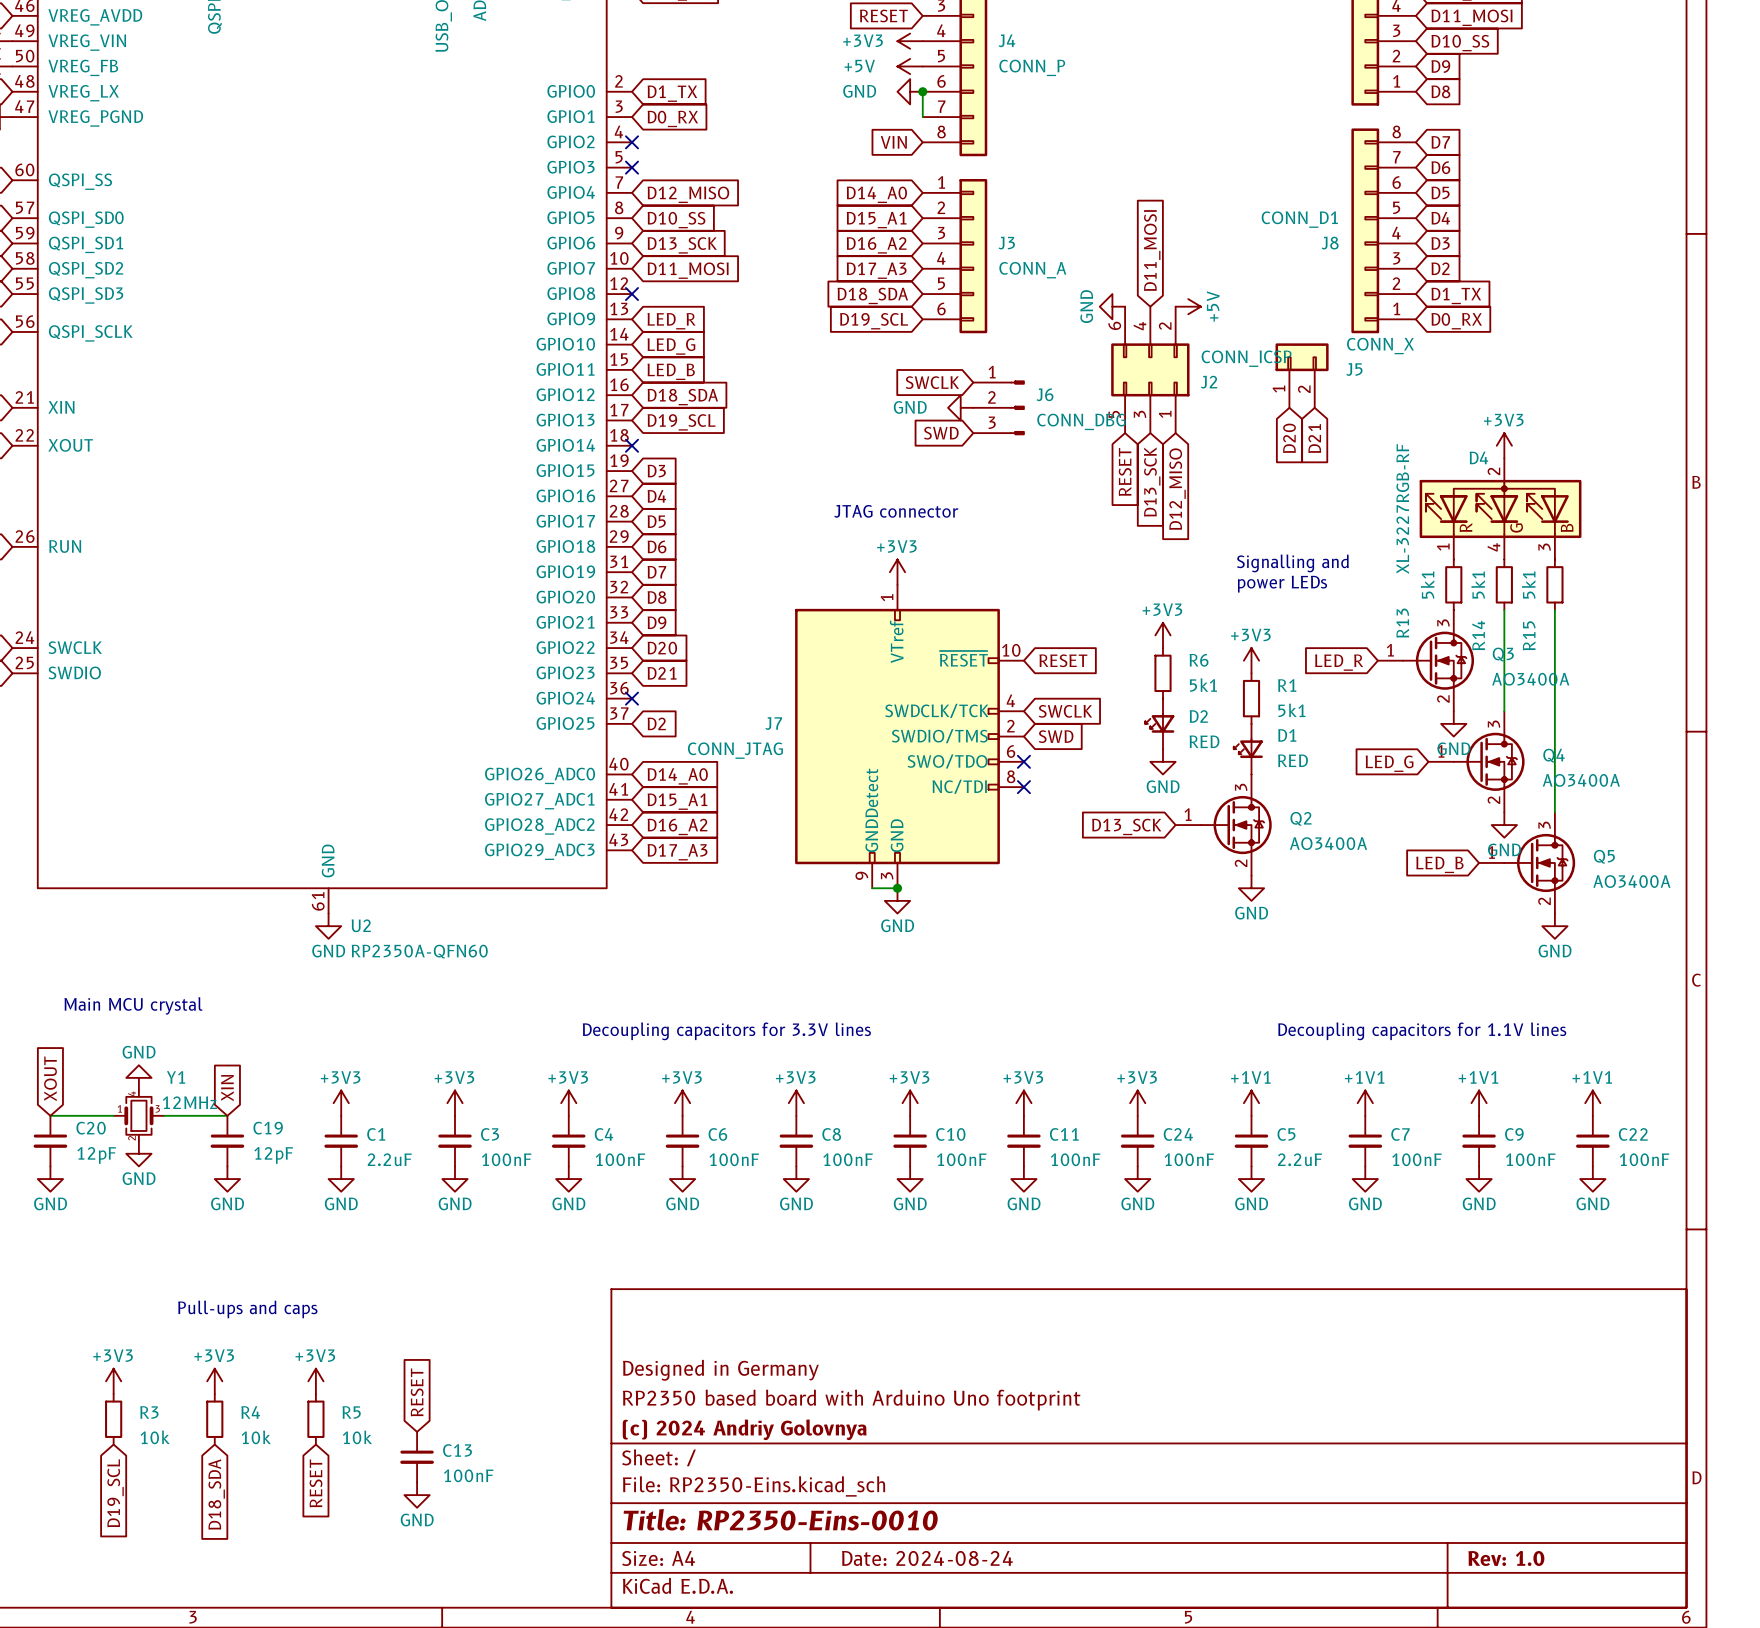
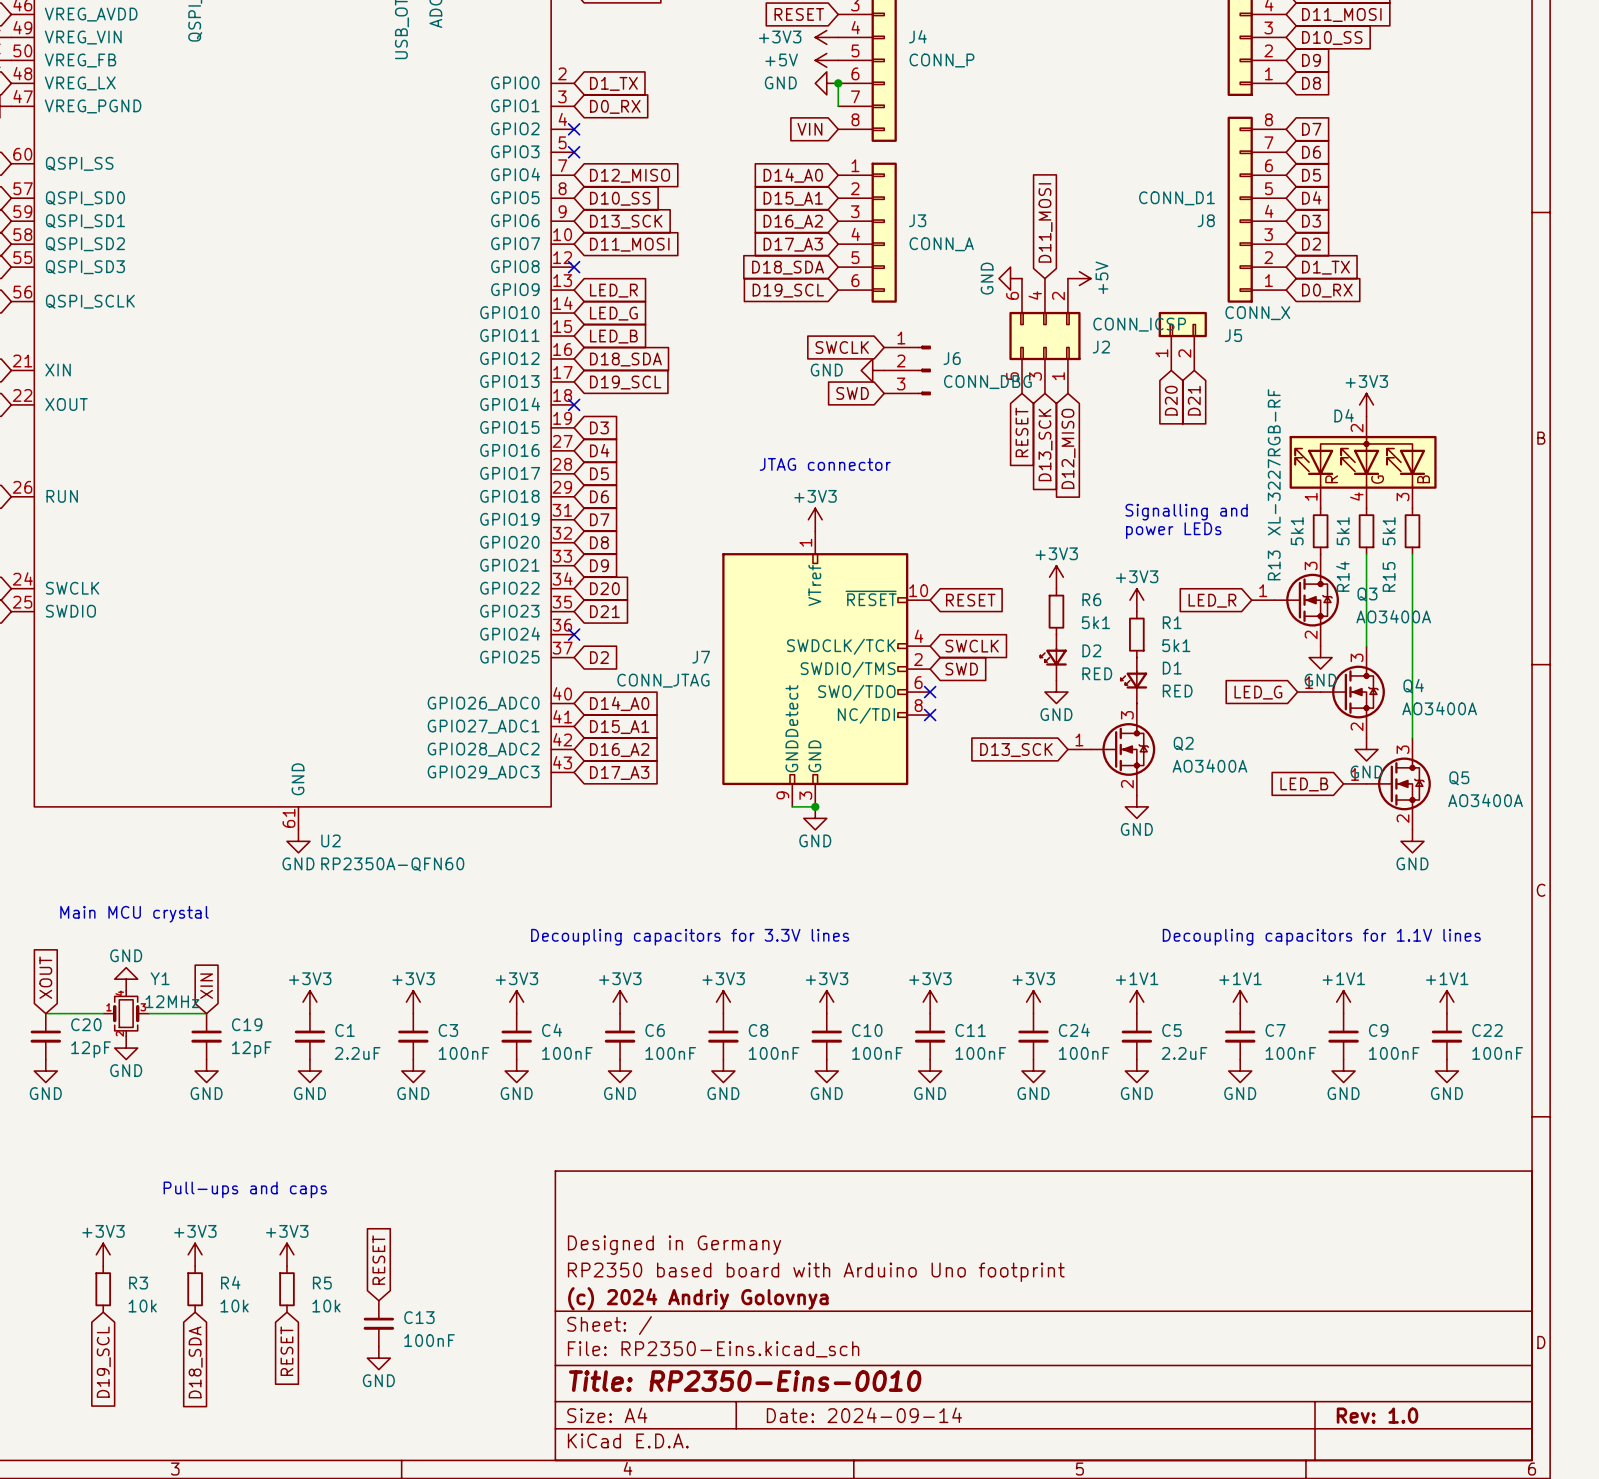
title block: Date: 2024-08-24 (927, 1558) -> Date: 2024-09-14 (864, 1415)

